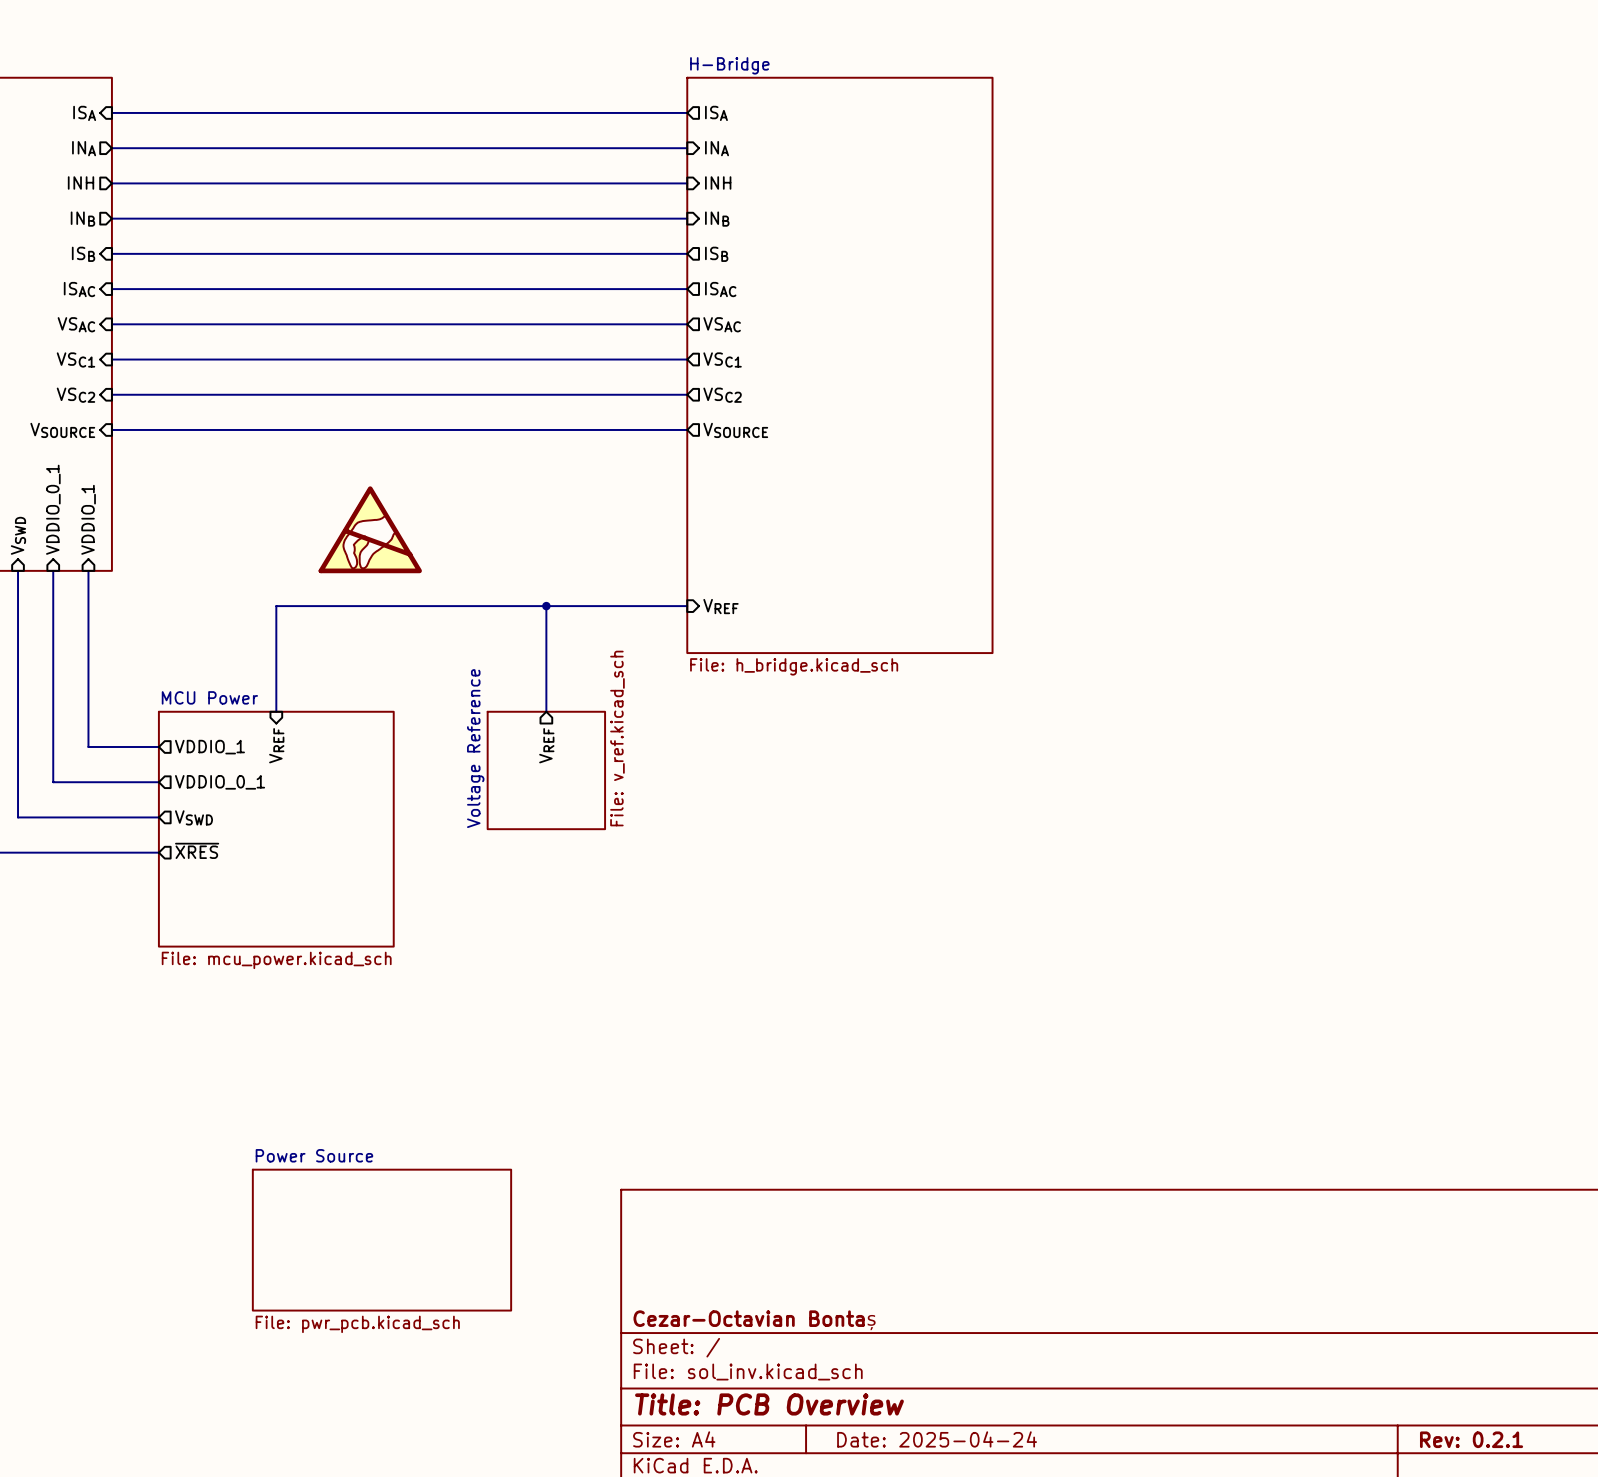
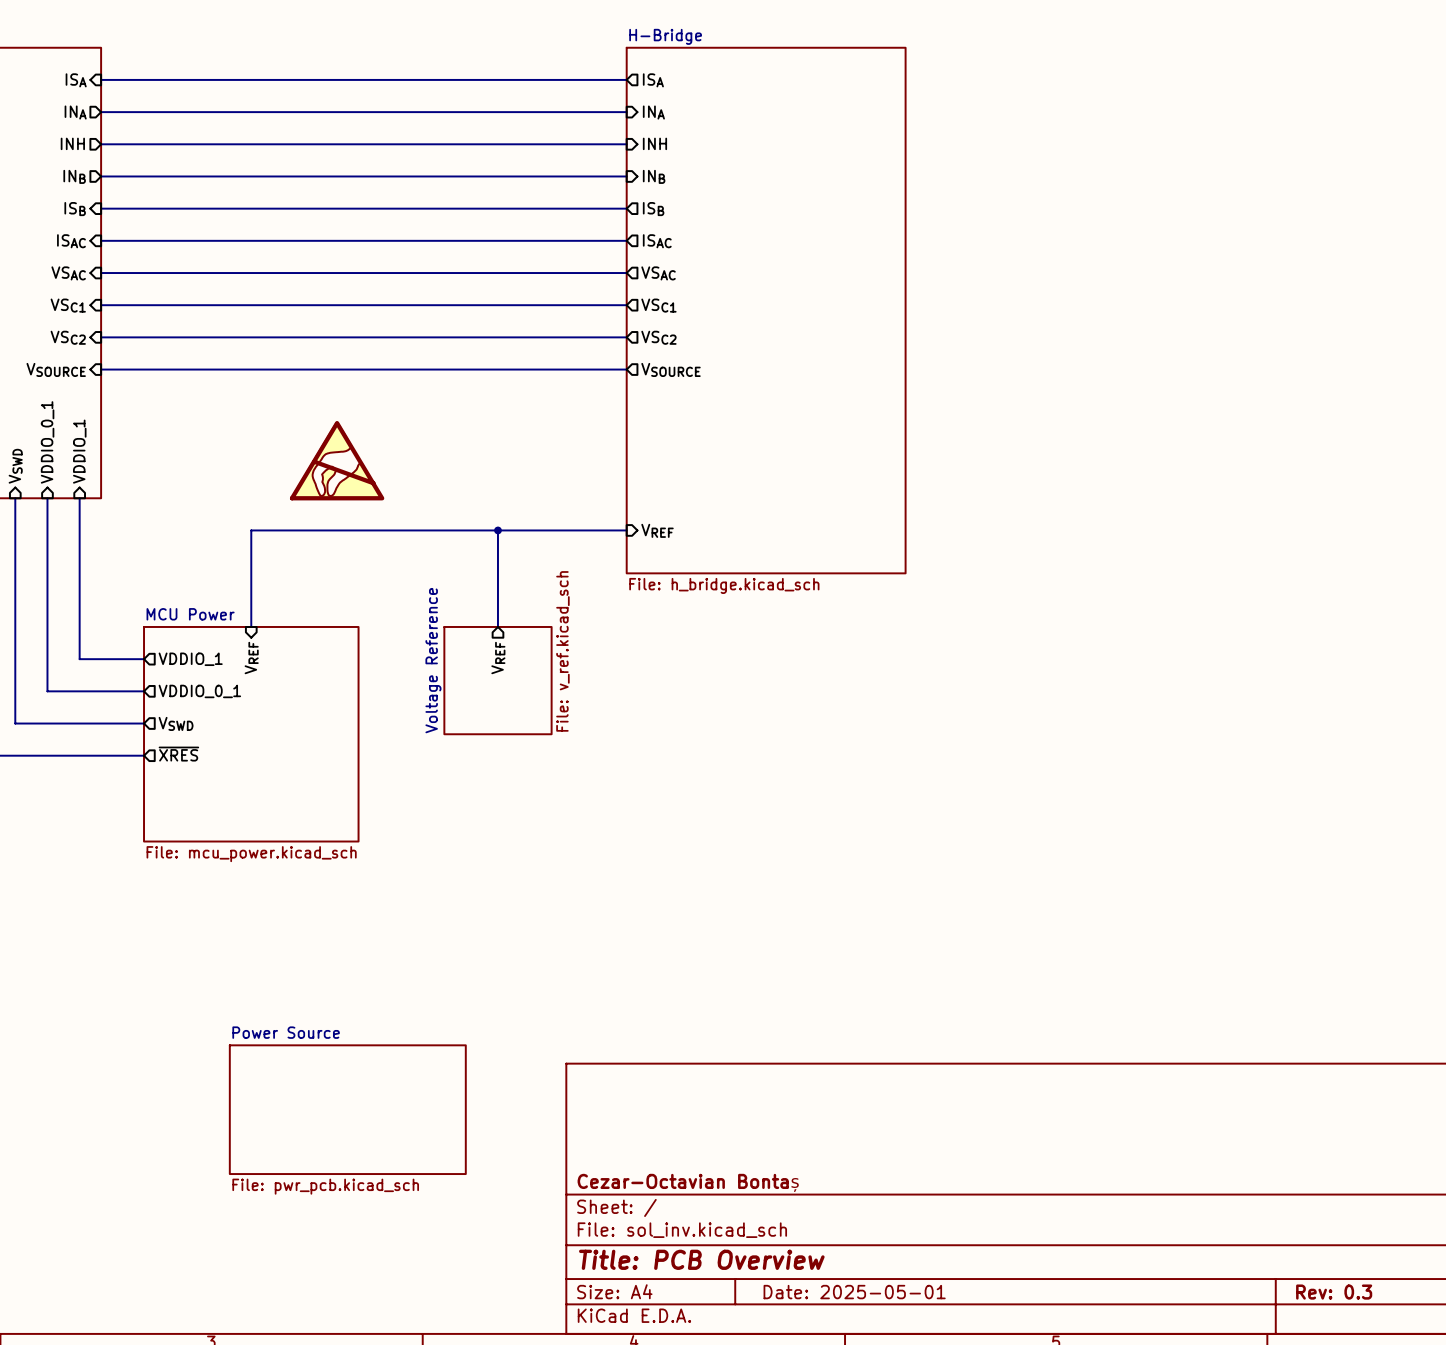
title block: Date: 2025-04-24 (937, 1439) -> Date: 2025-05-01 (854, 1292)
title block: Rev: 0.2.1 (1471, 1439) -> Rev: 0.3 (1334, 1292)

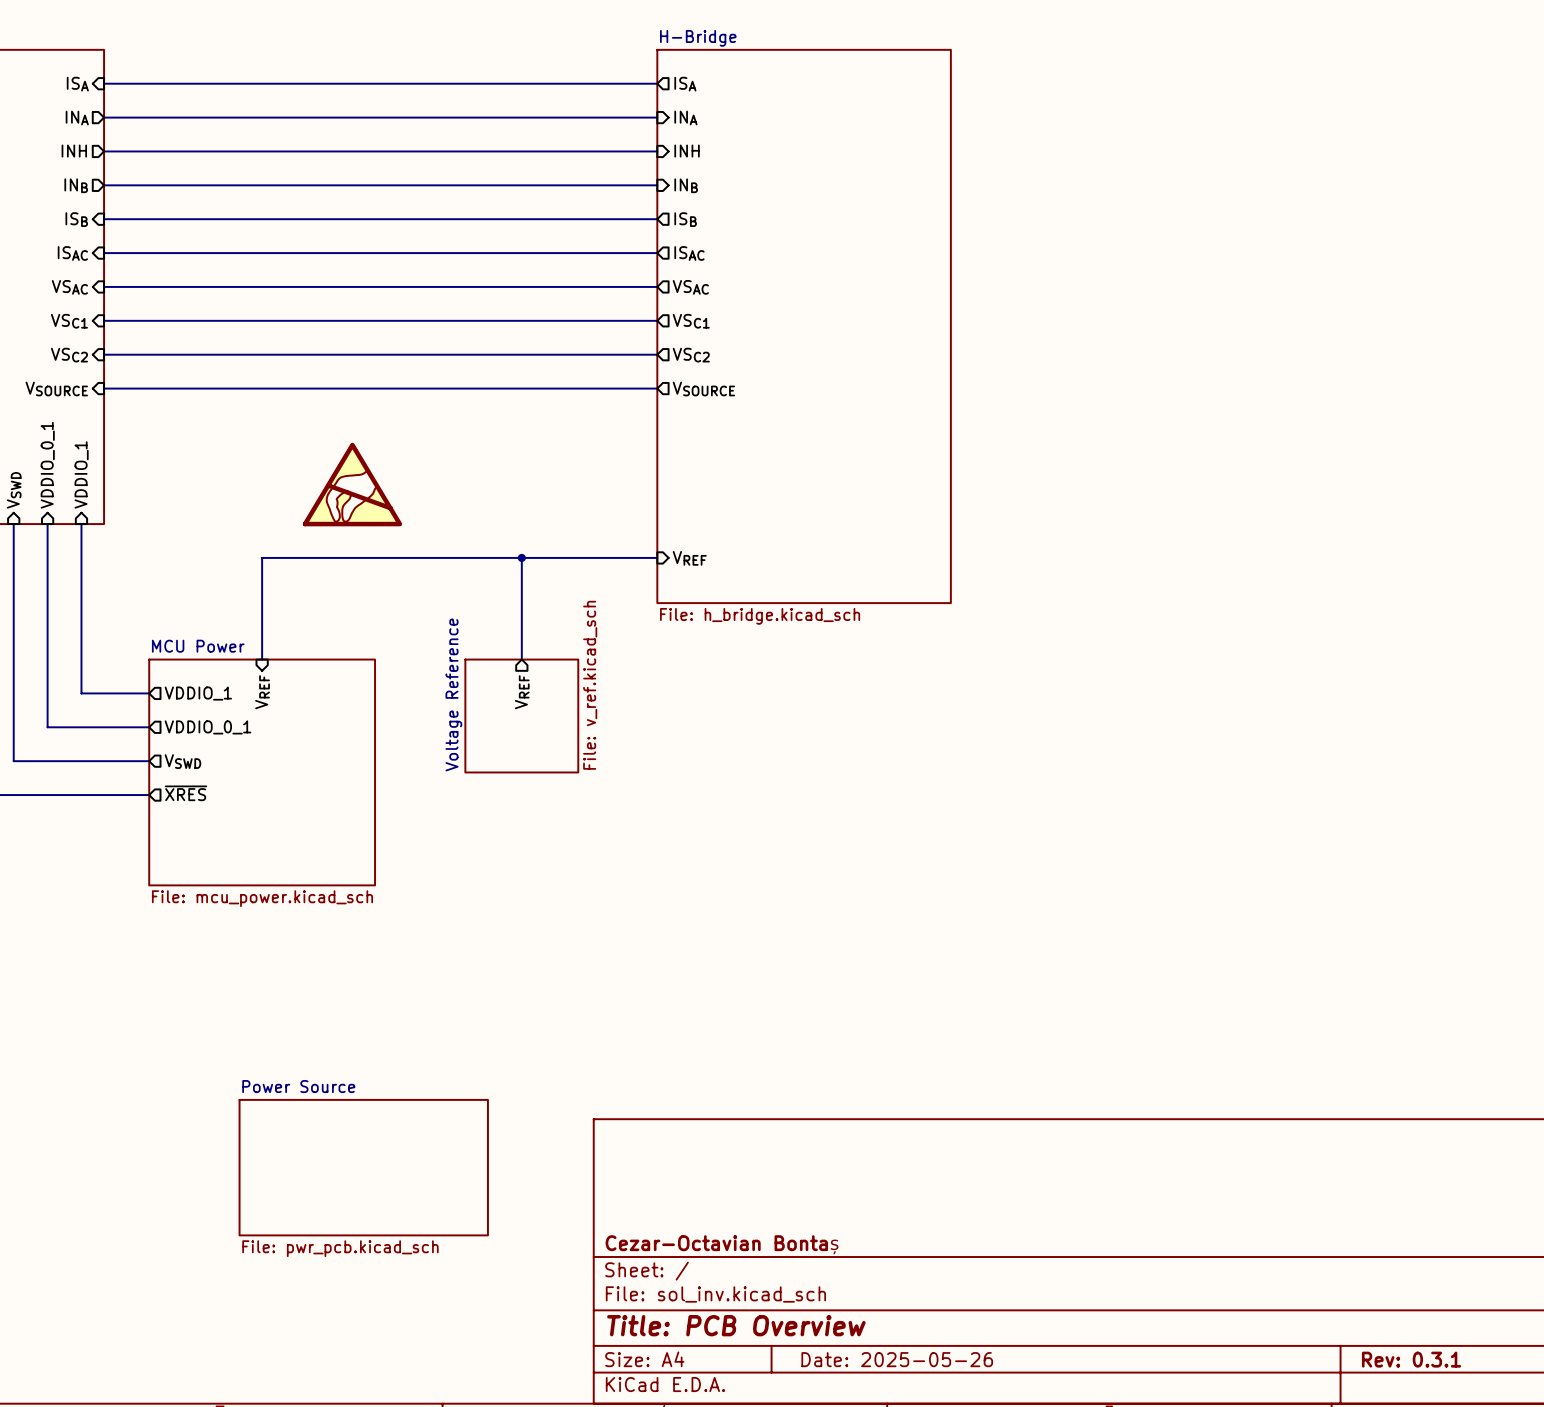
title block: Date: 2025-05-01 (854, 1292) -> Date: 2025-05-26 (897, 1359)
title block: Rev: 0.3 (1334, 1292) -> Rev: 0.3.1 (1411, 1359)

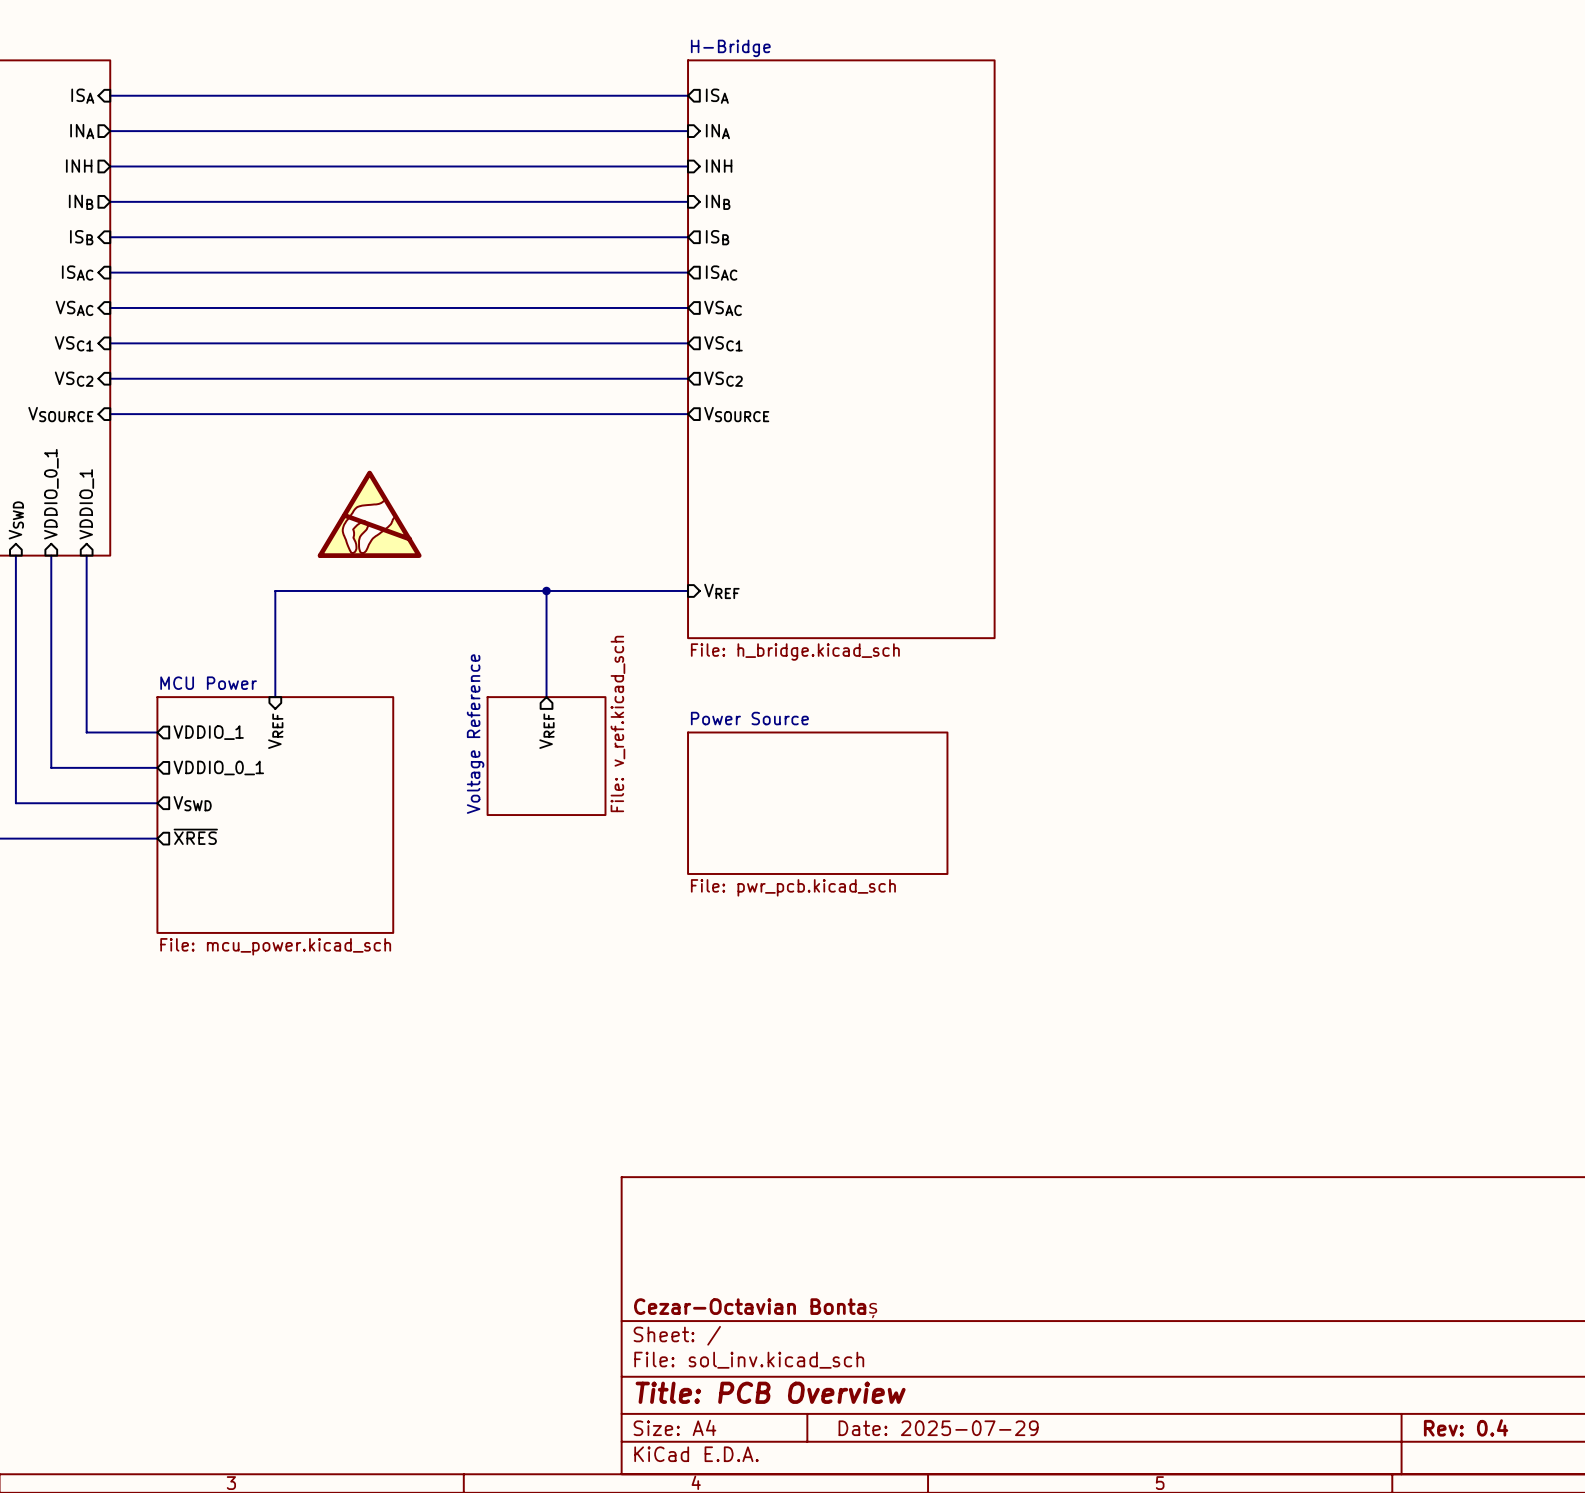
sheet Power Source: none -> File: pwr_pcb.kicad_sch (817, 803)
sheet Power Source: File: pwr_pcb.kicad_sch (363, 1167) -> none
title block: Date: 2025-05-26 (897, 1359) -> Date: 2025-07-29 (938, 1428)
title block: Rev: 0.3.1 (1411, 1359) -> Rev: 0.4 (1466, 1427)

